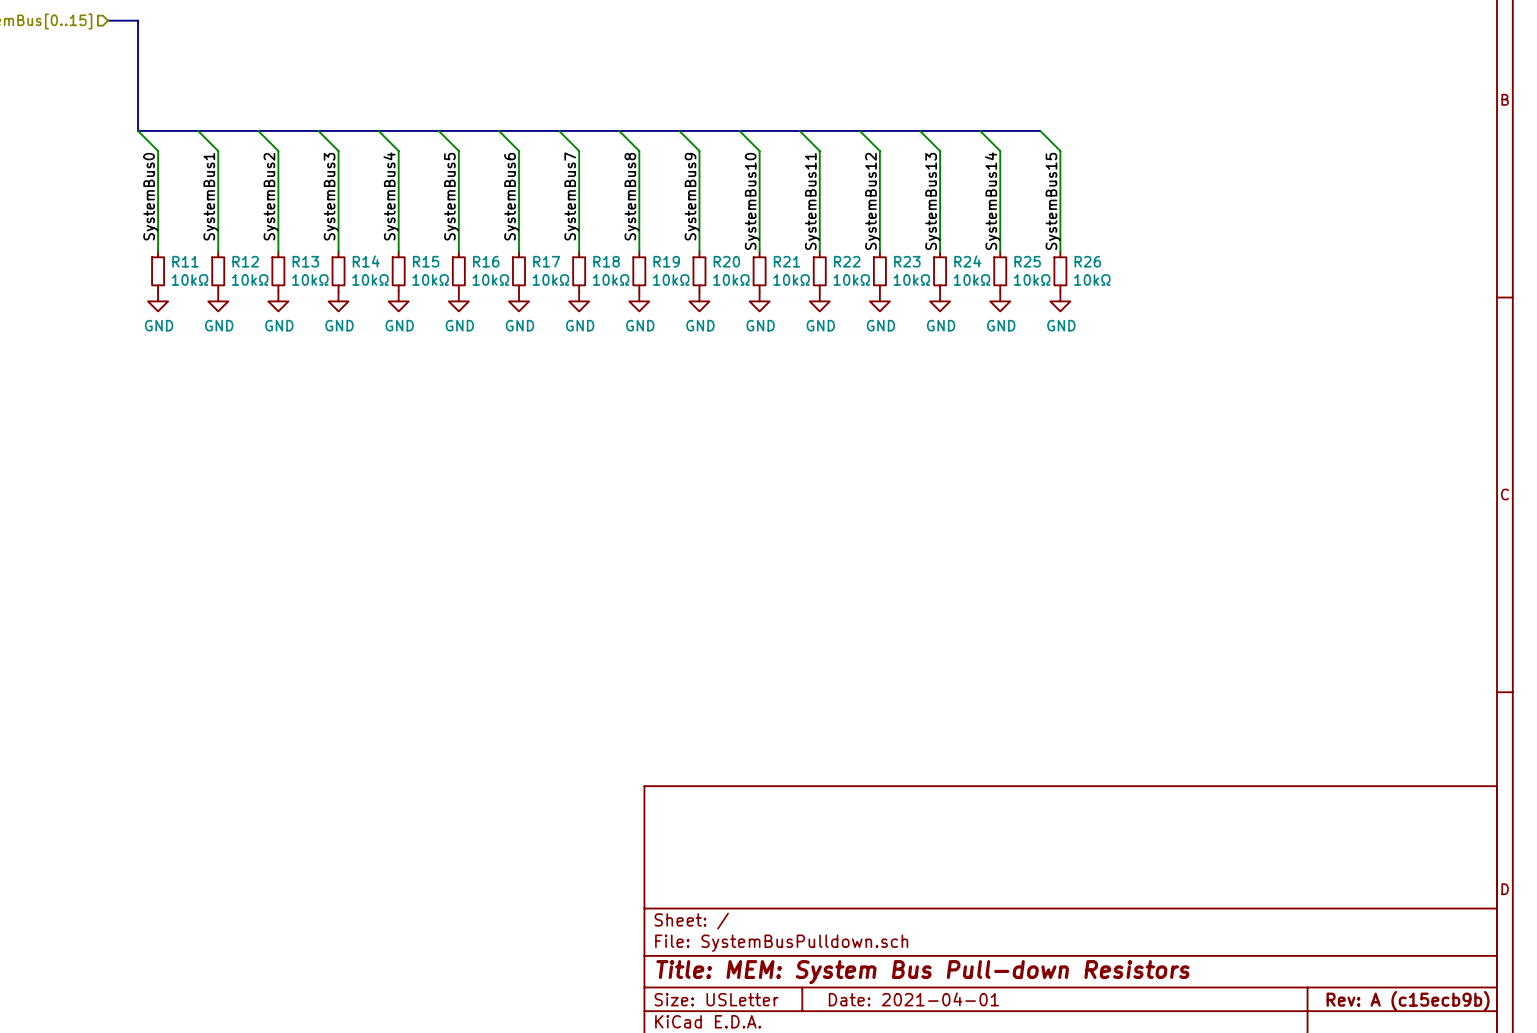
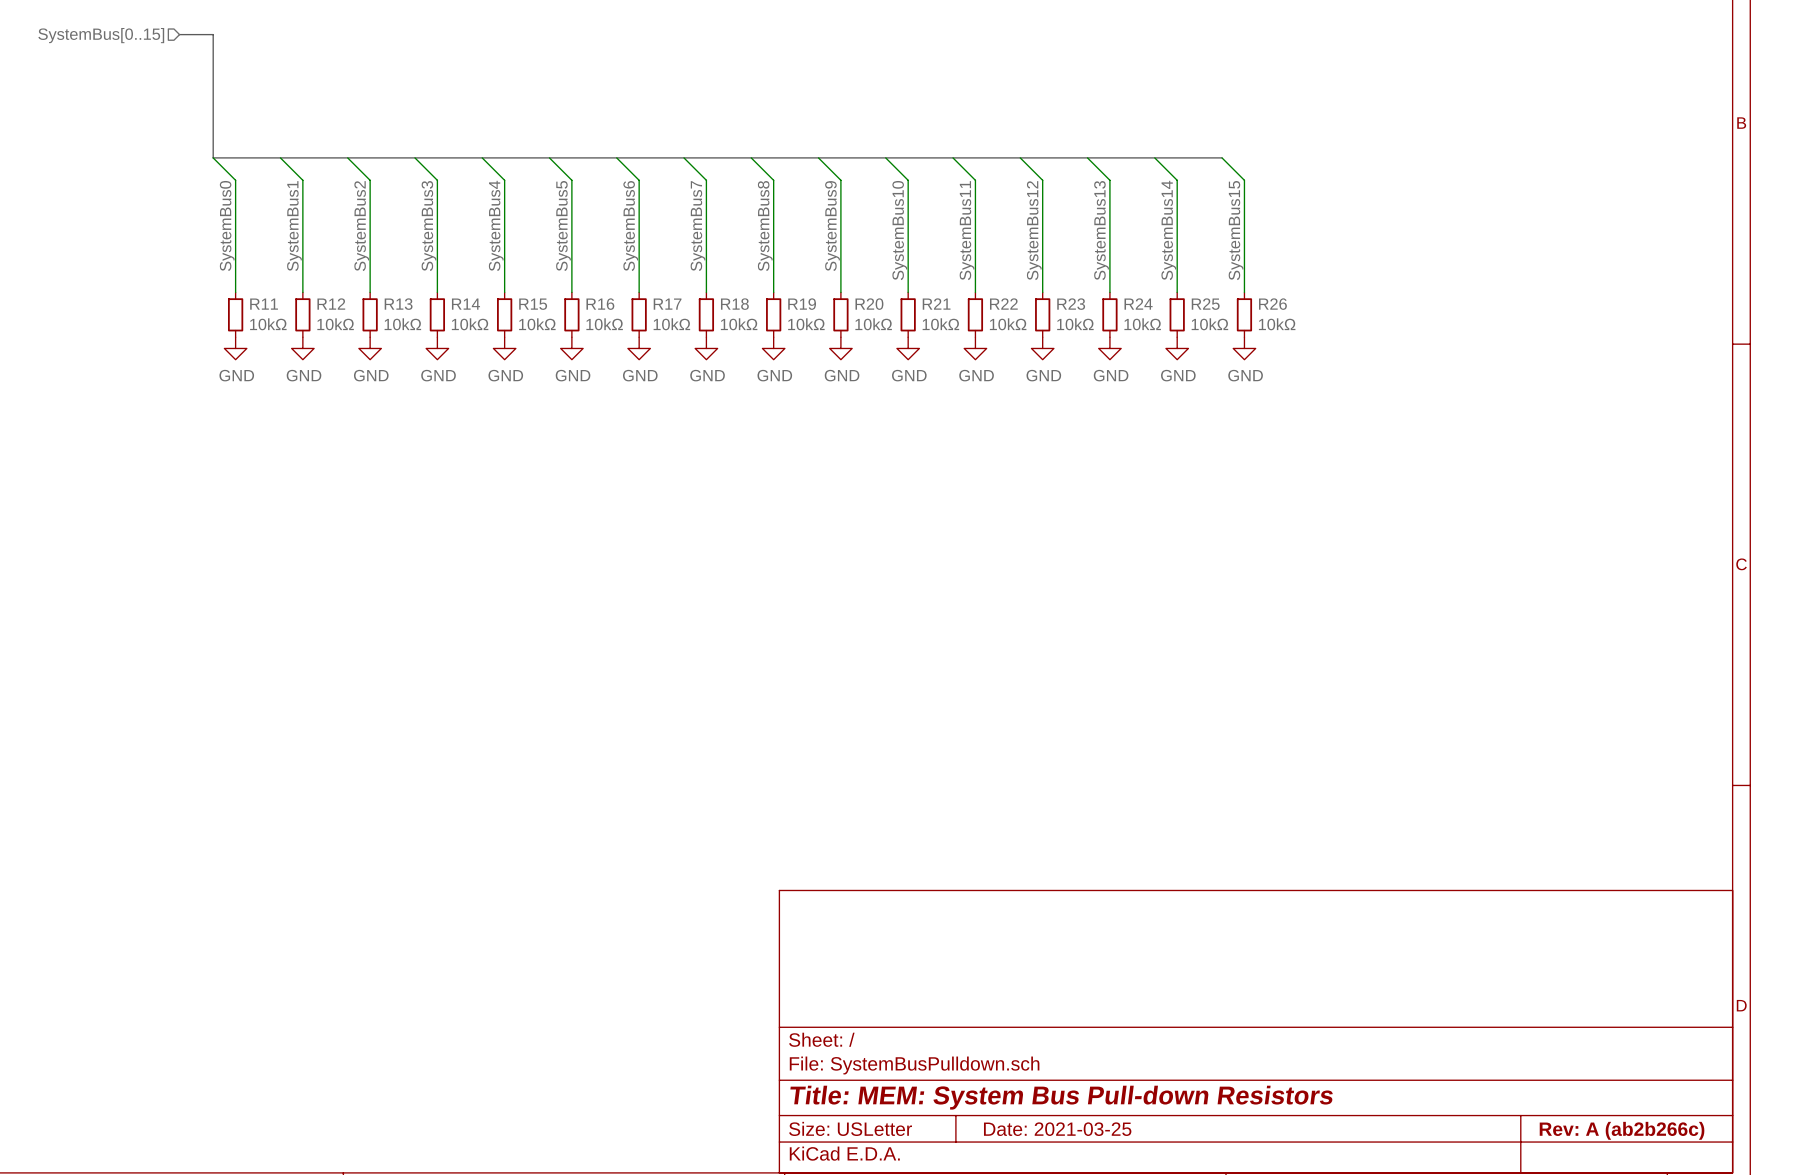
title block: Date: 2021-04-01 (913, 999) -> Date: 2021-03-25 (1057, 1129)
title block: Rev: A (c15ecb9b) (1408, 1001) -> Rev: A (ab2b266c) (1622, 1130)

